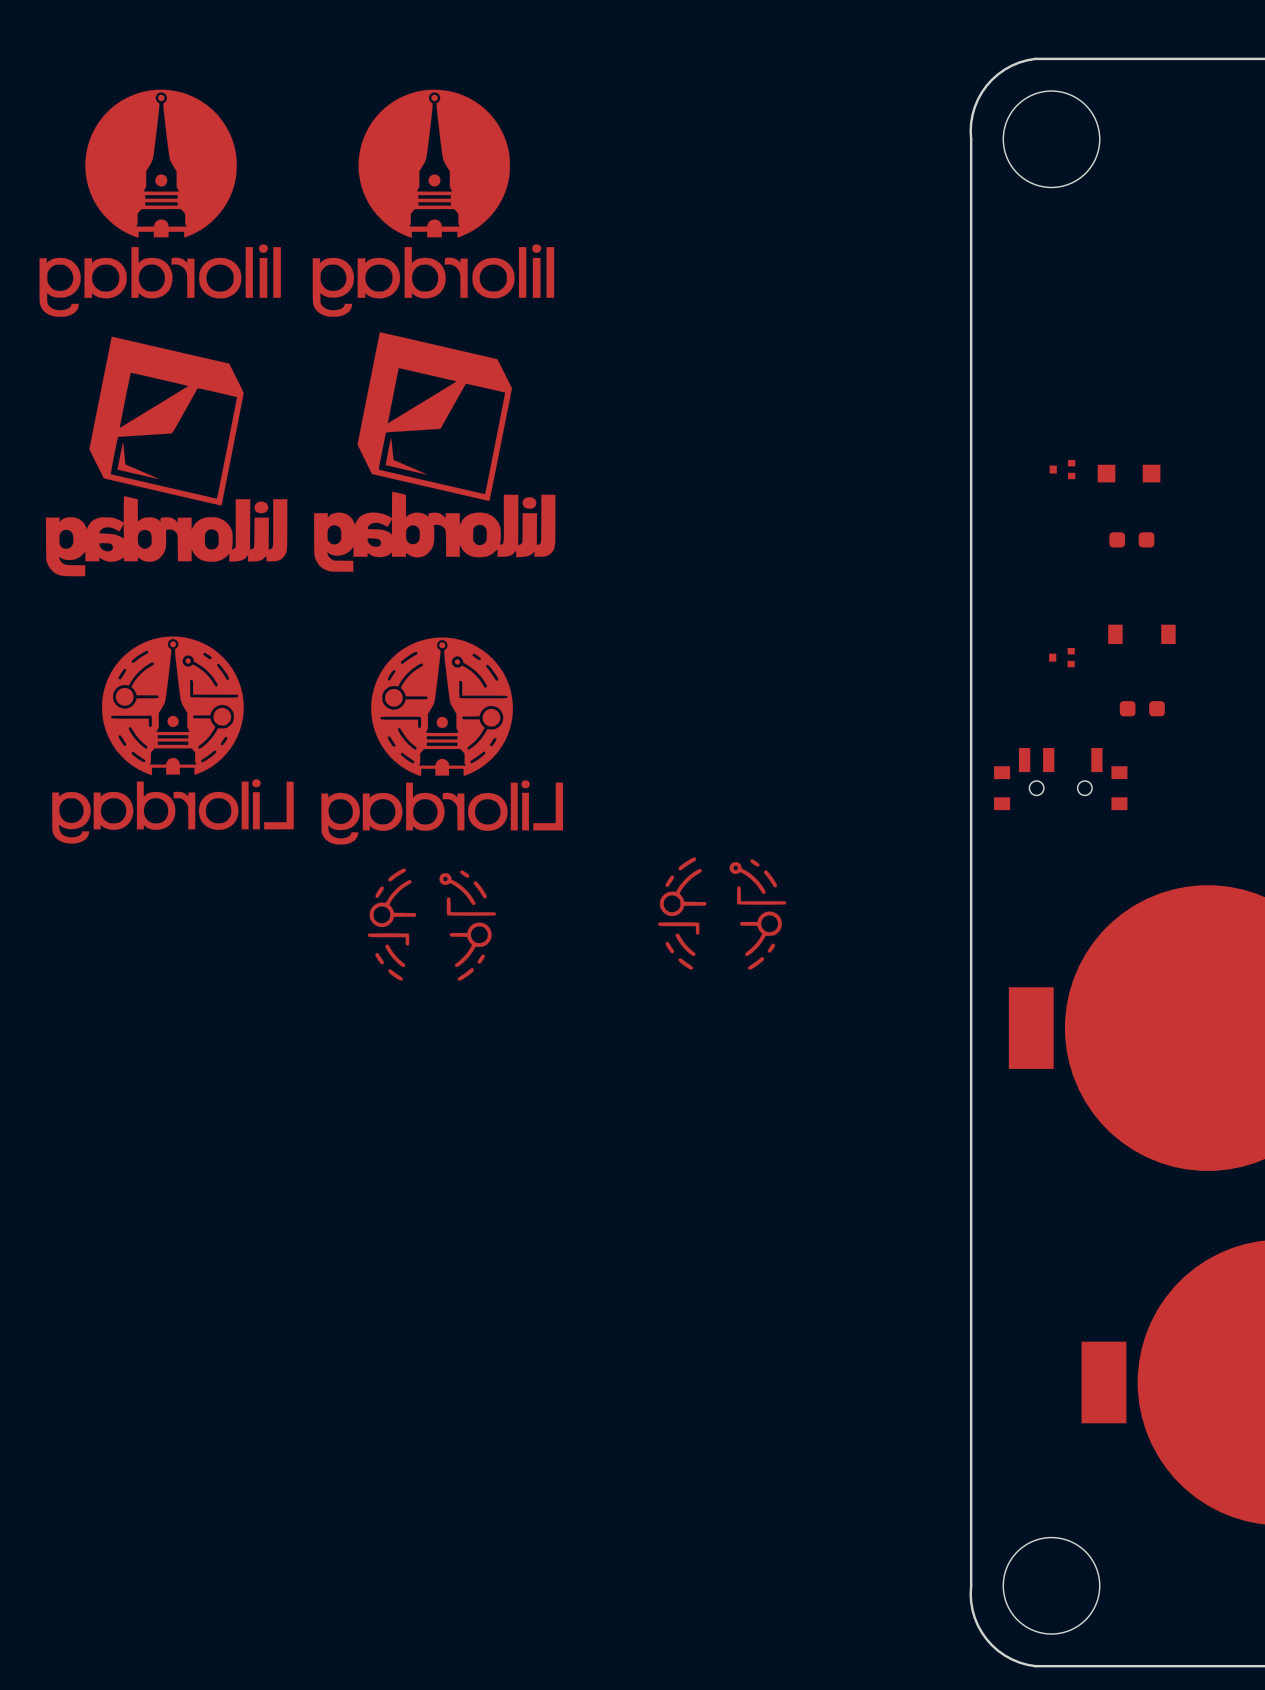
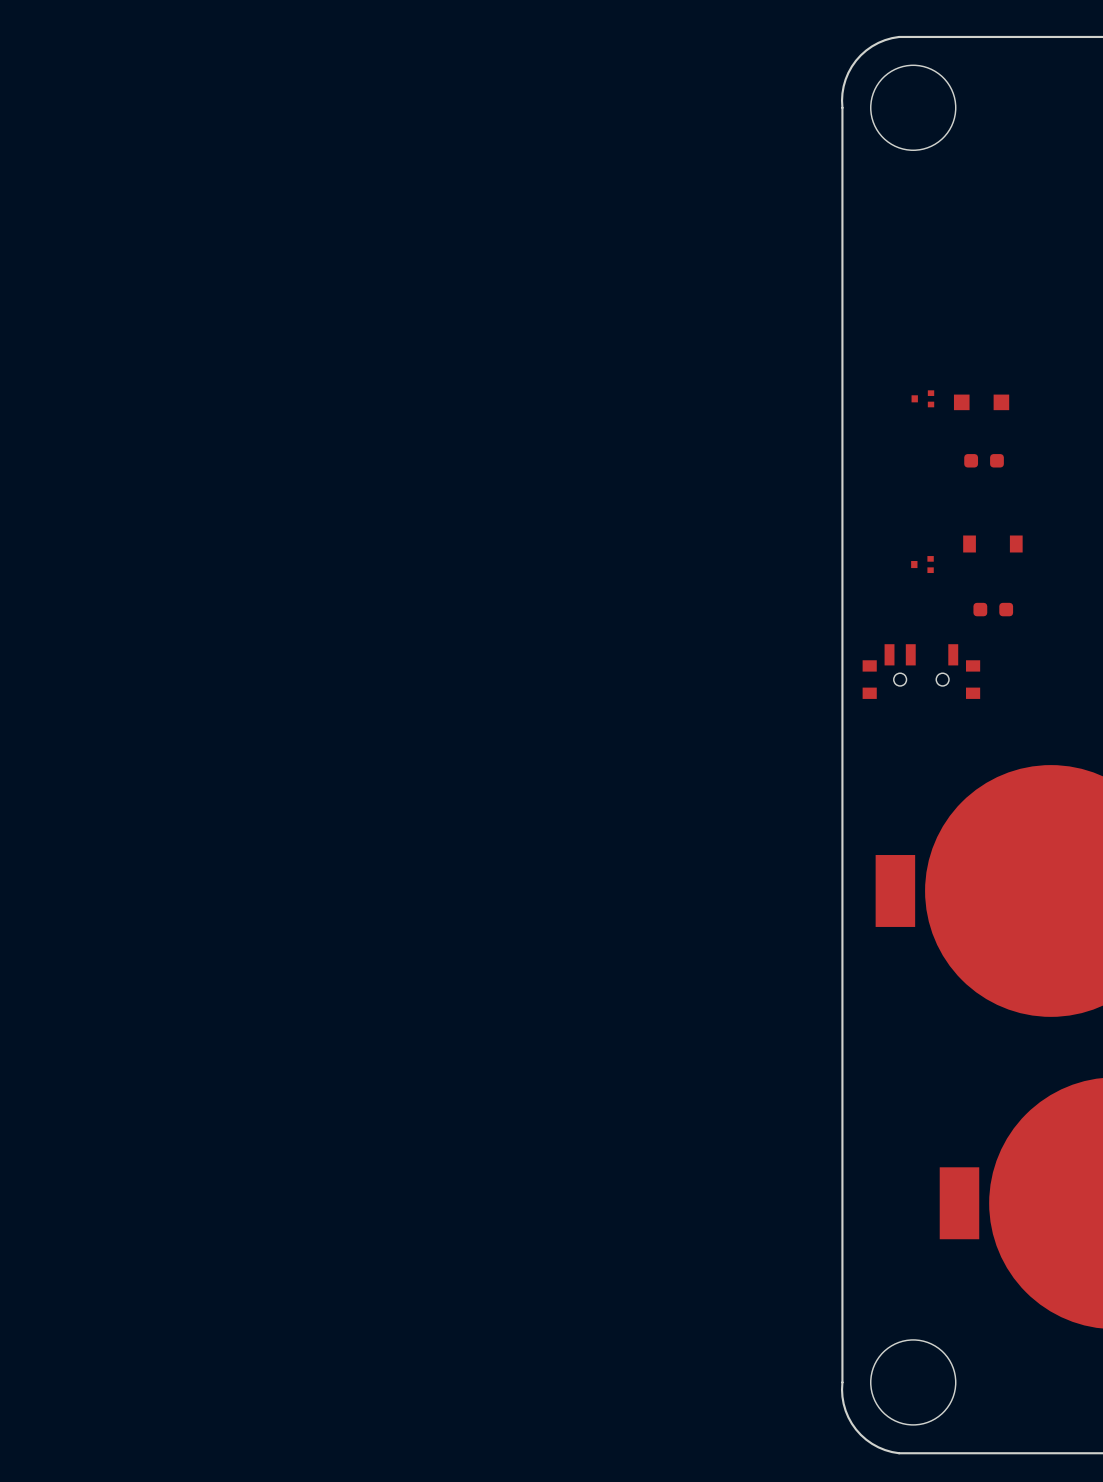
drawing: [39, 89, 281, 317] -> none
drawing: [312, 89, 556, 572] -> none
drawing: [45, 336, 288, 577] -> none
drawing: [52, 636, 294, 844] -> none
drawing: [321, 637, 564, 845] -> none
drawing: [658, 857, 787, 970] -> none
drawing: [367, 868, 496, 981] -> none

